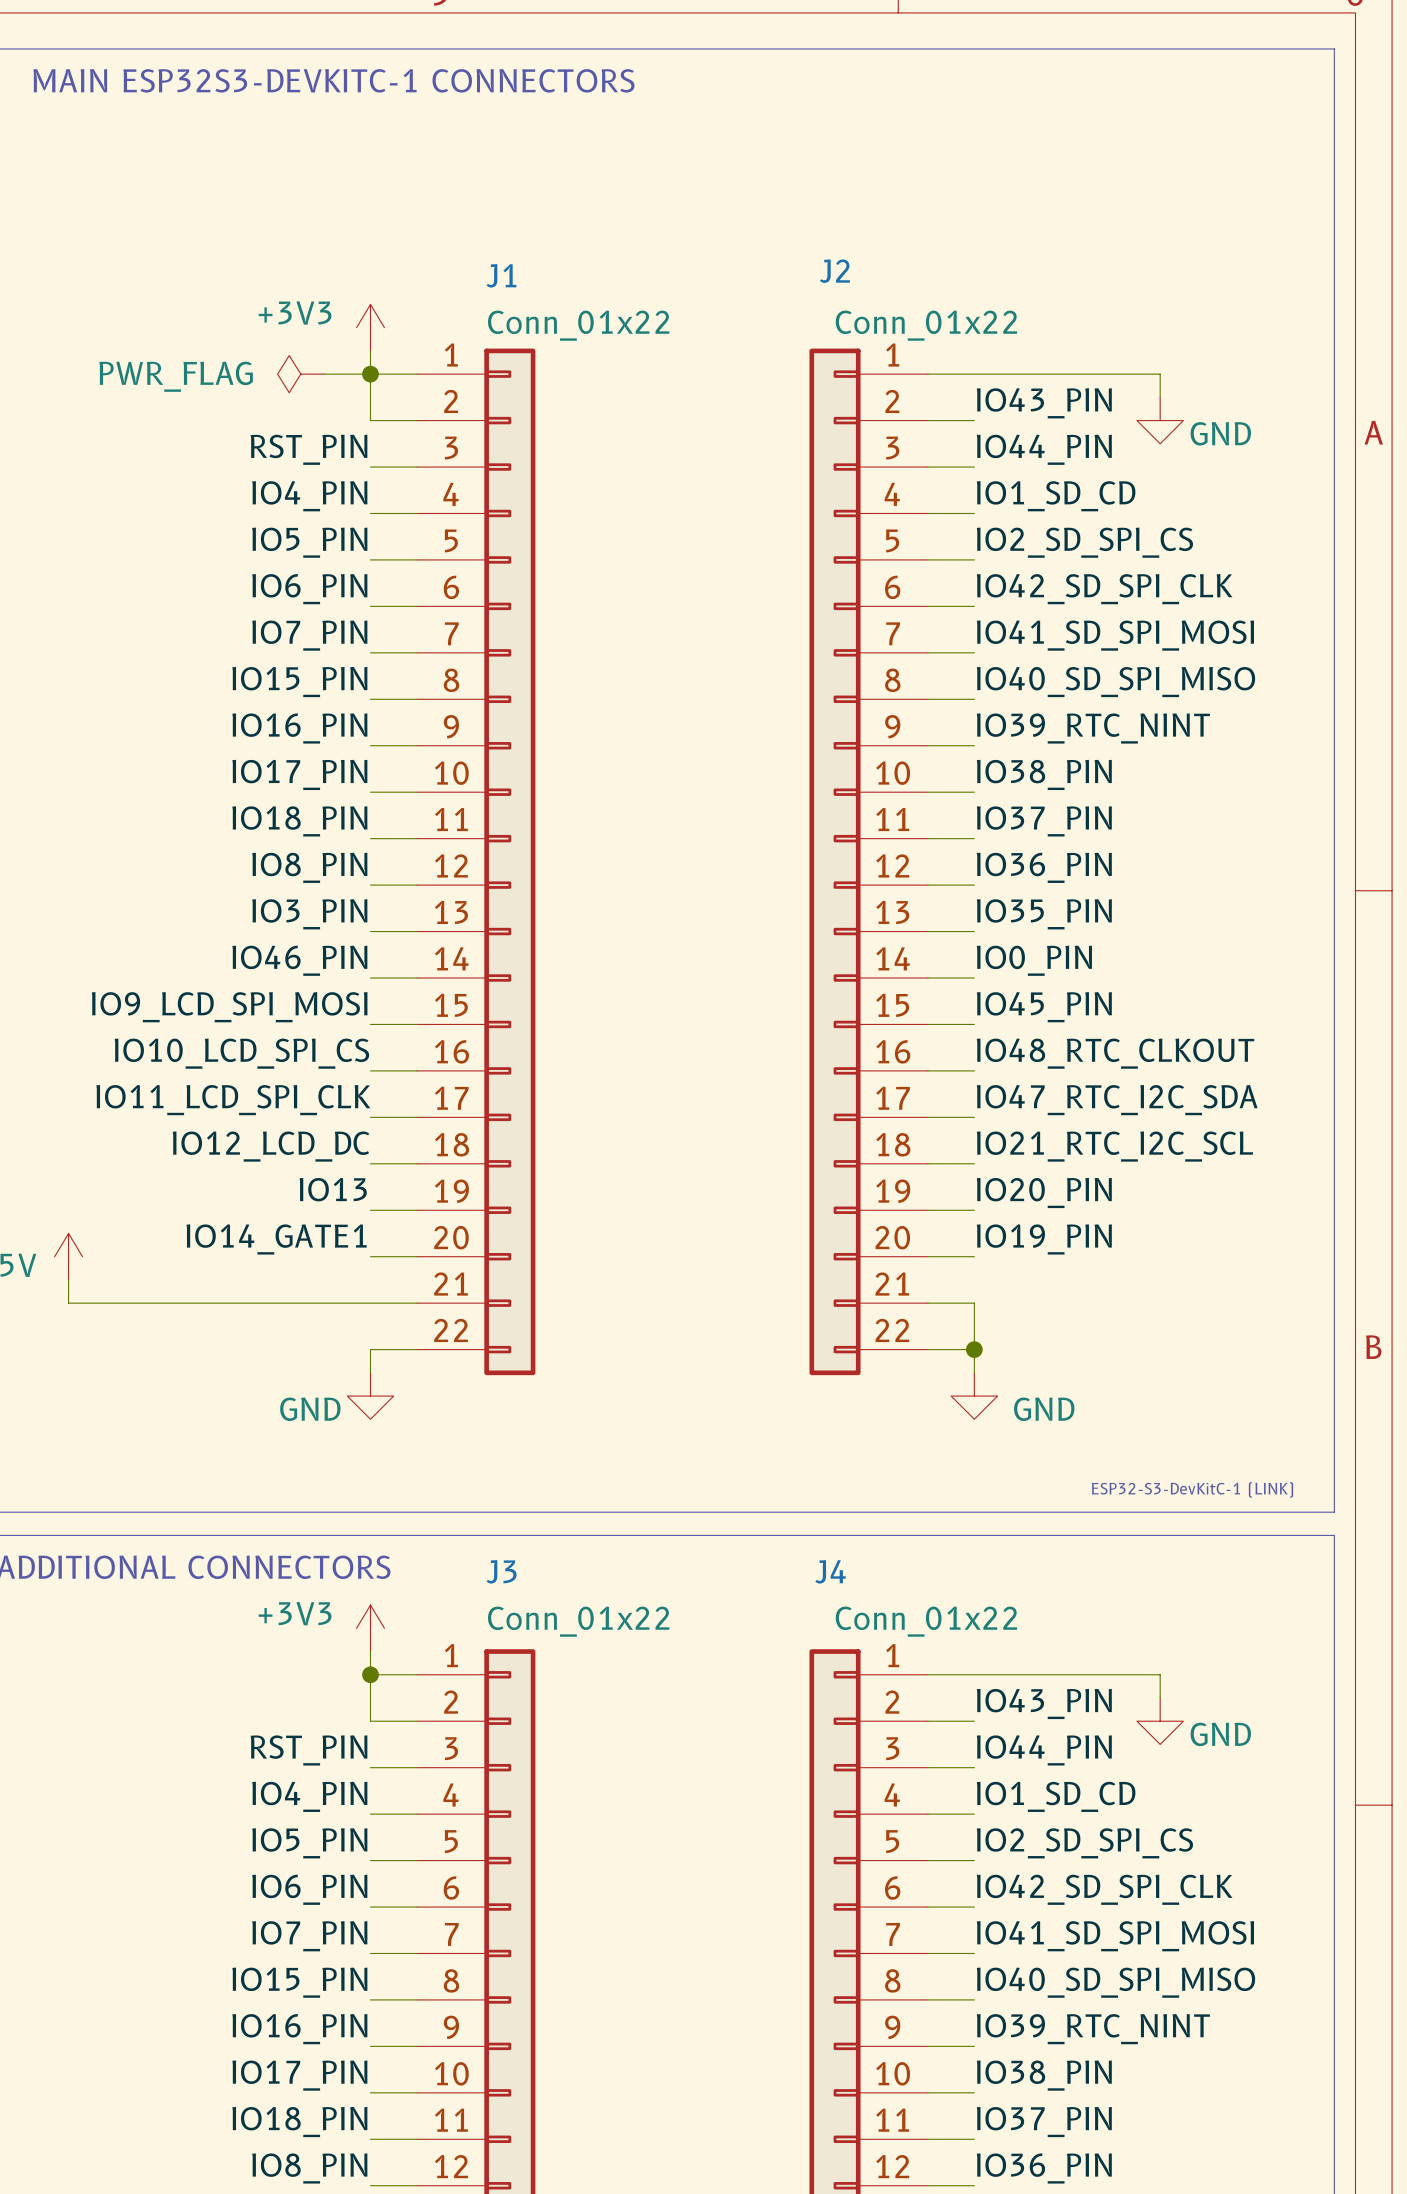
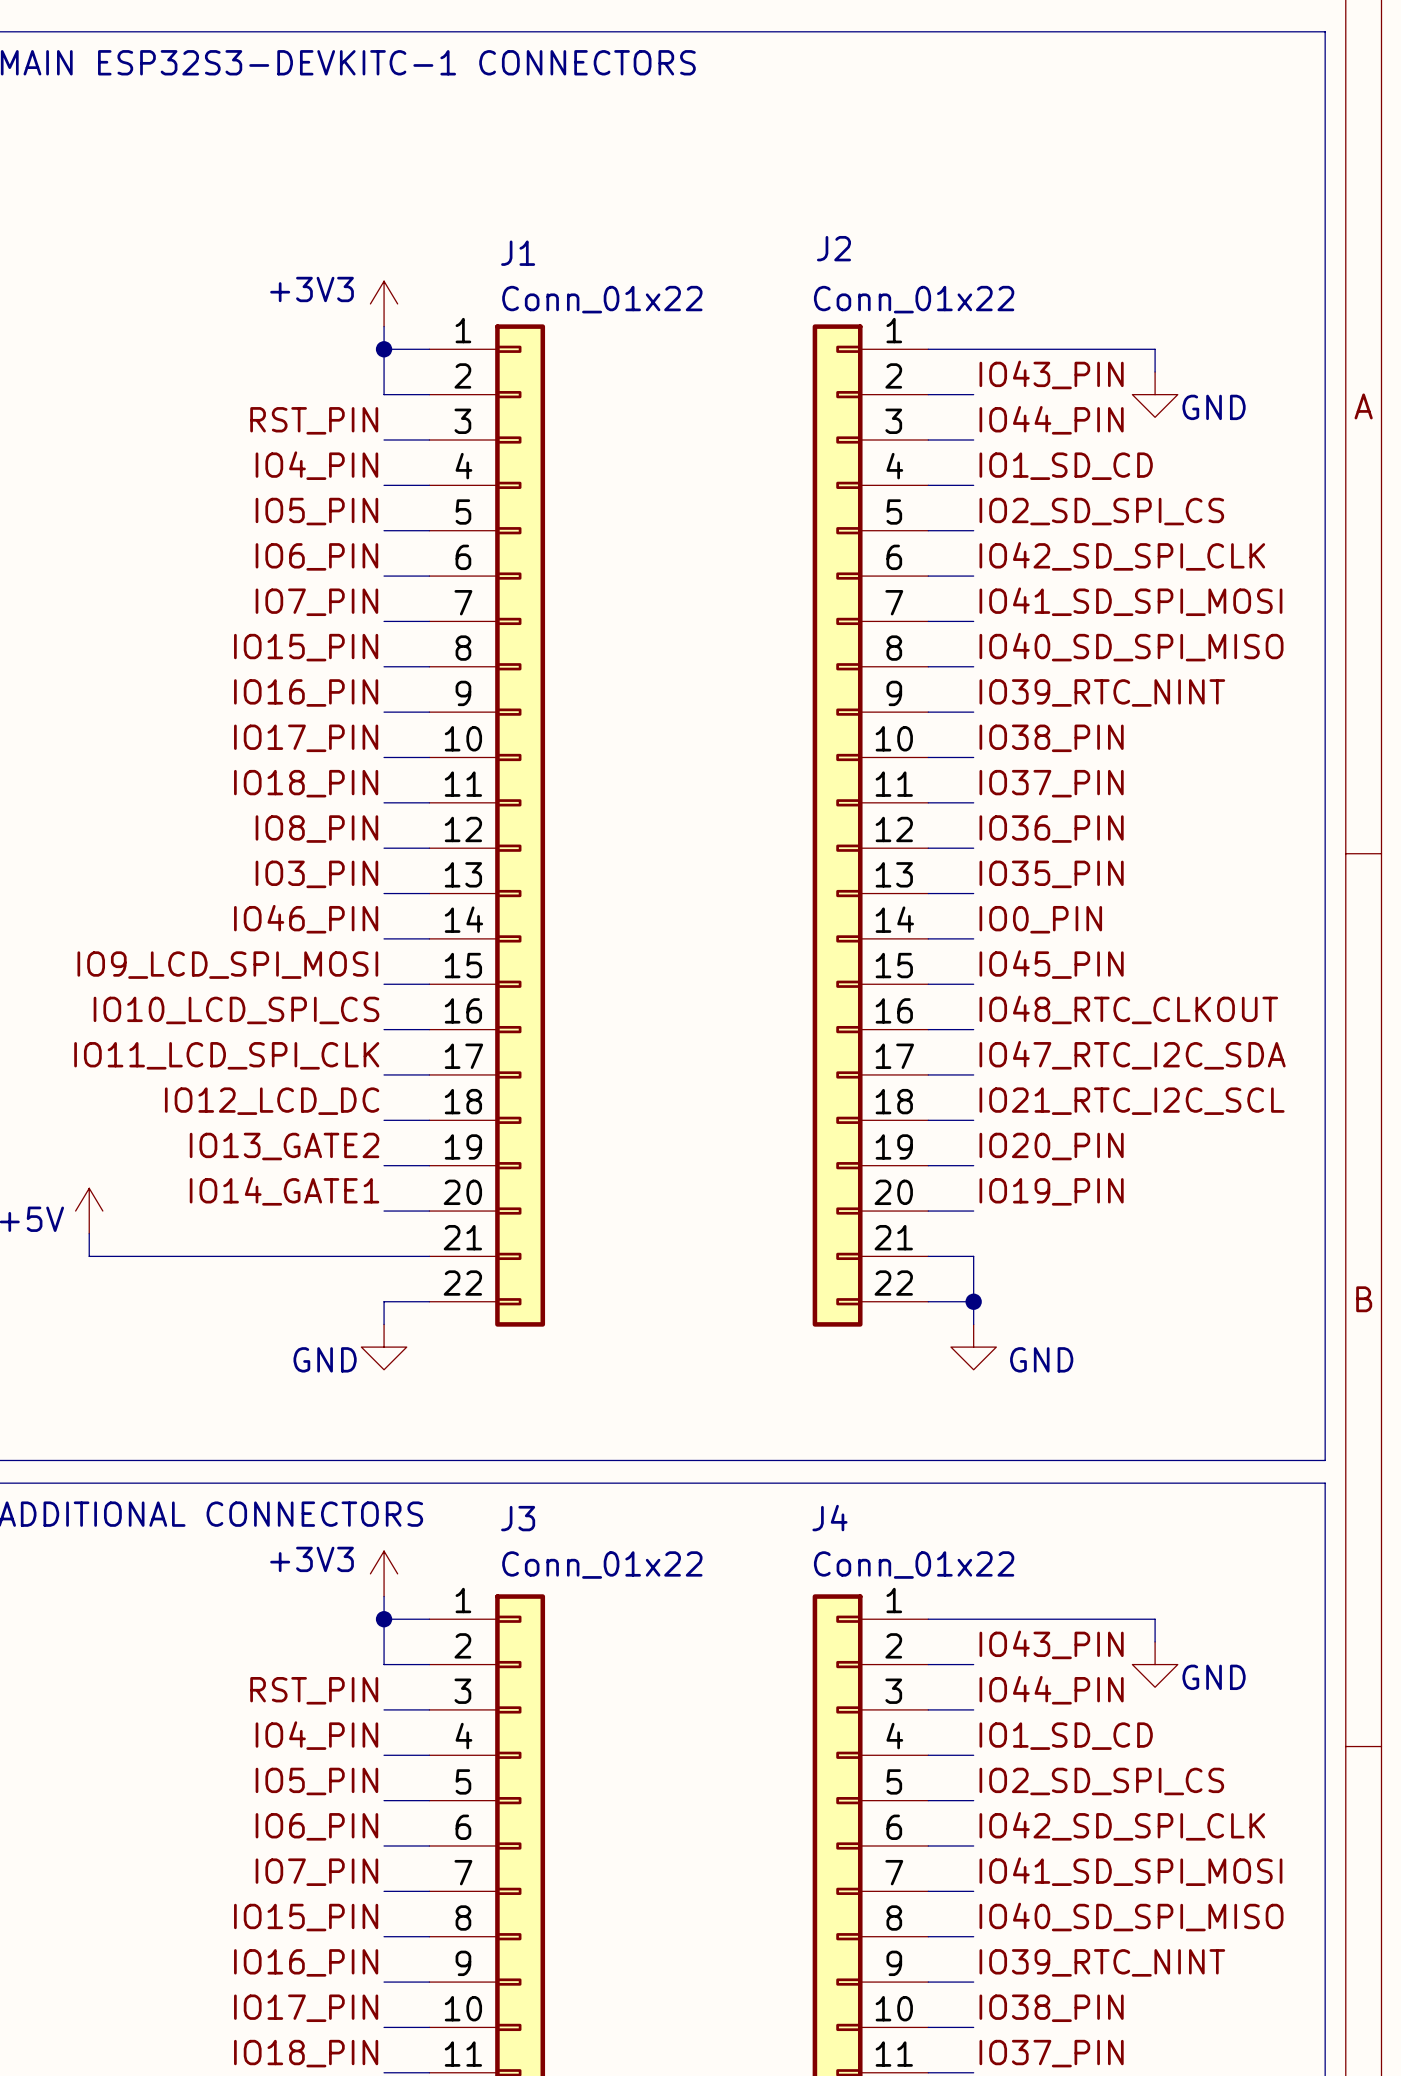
power symbol: PWR_FLAG (300, 374) -> none
wire: (324, 374) (370, 374) -> none
label: IO13 (333, 1189) -> IO13_GATE2 (284, 1146)
text: ESP32-S3-DevKitC-1 (LINK) (1192, 1489) -> none

